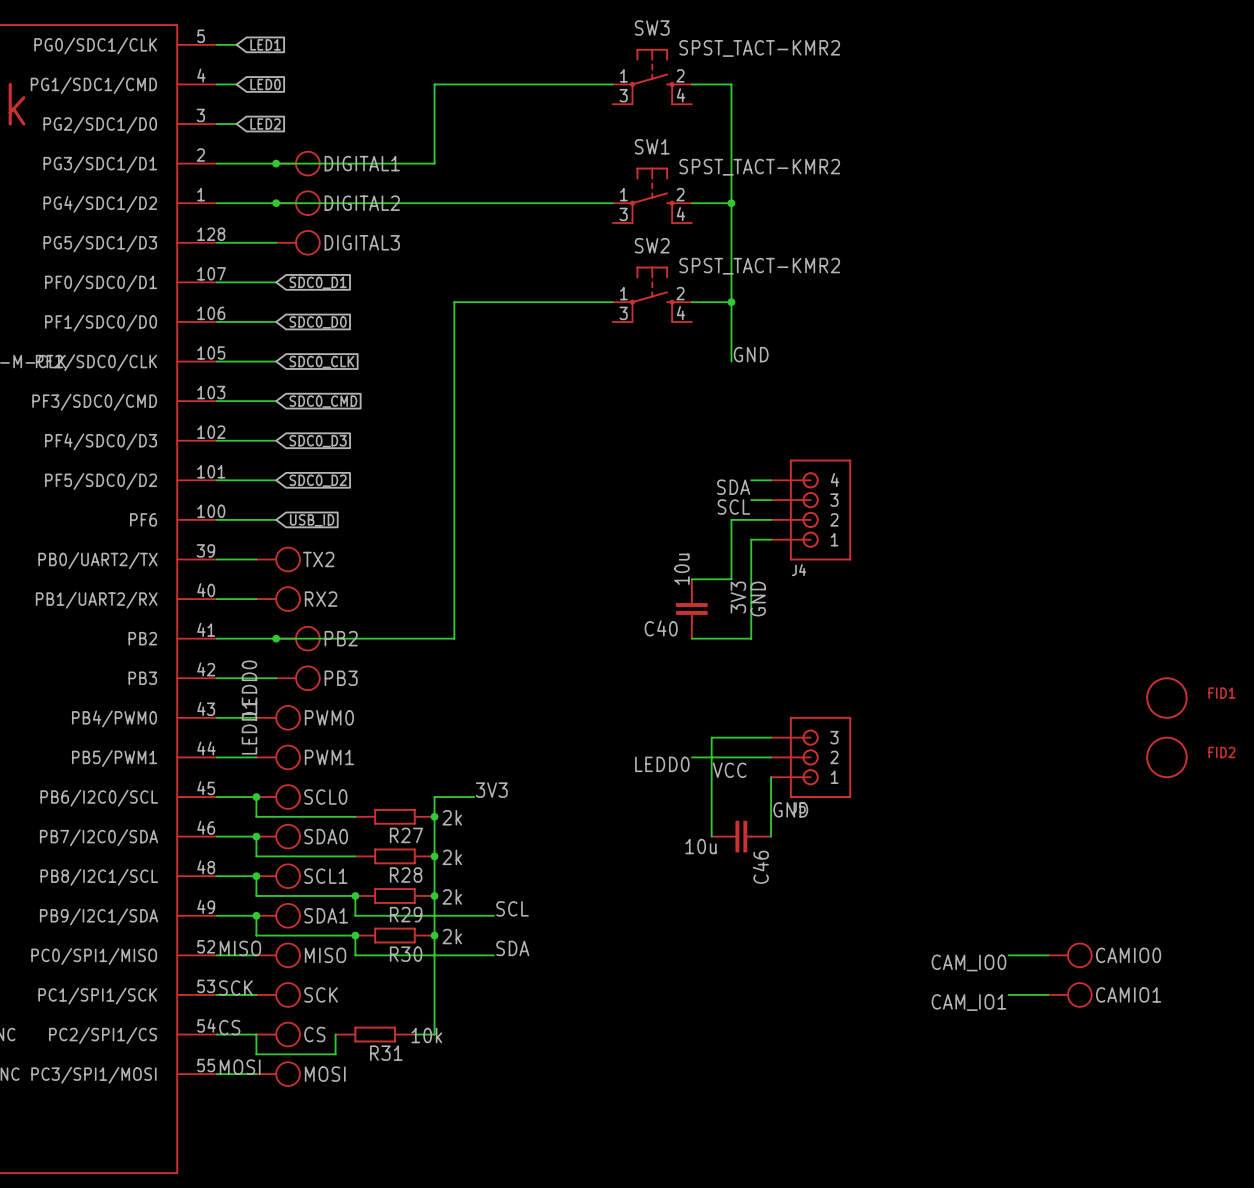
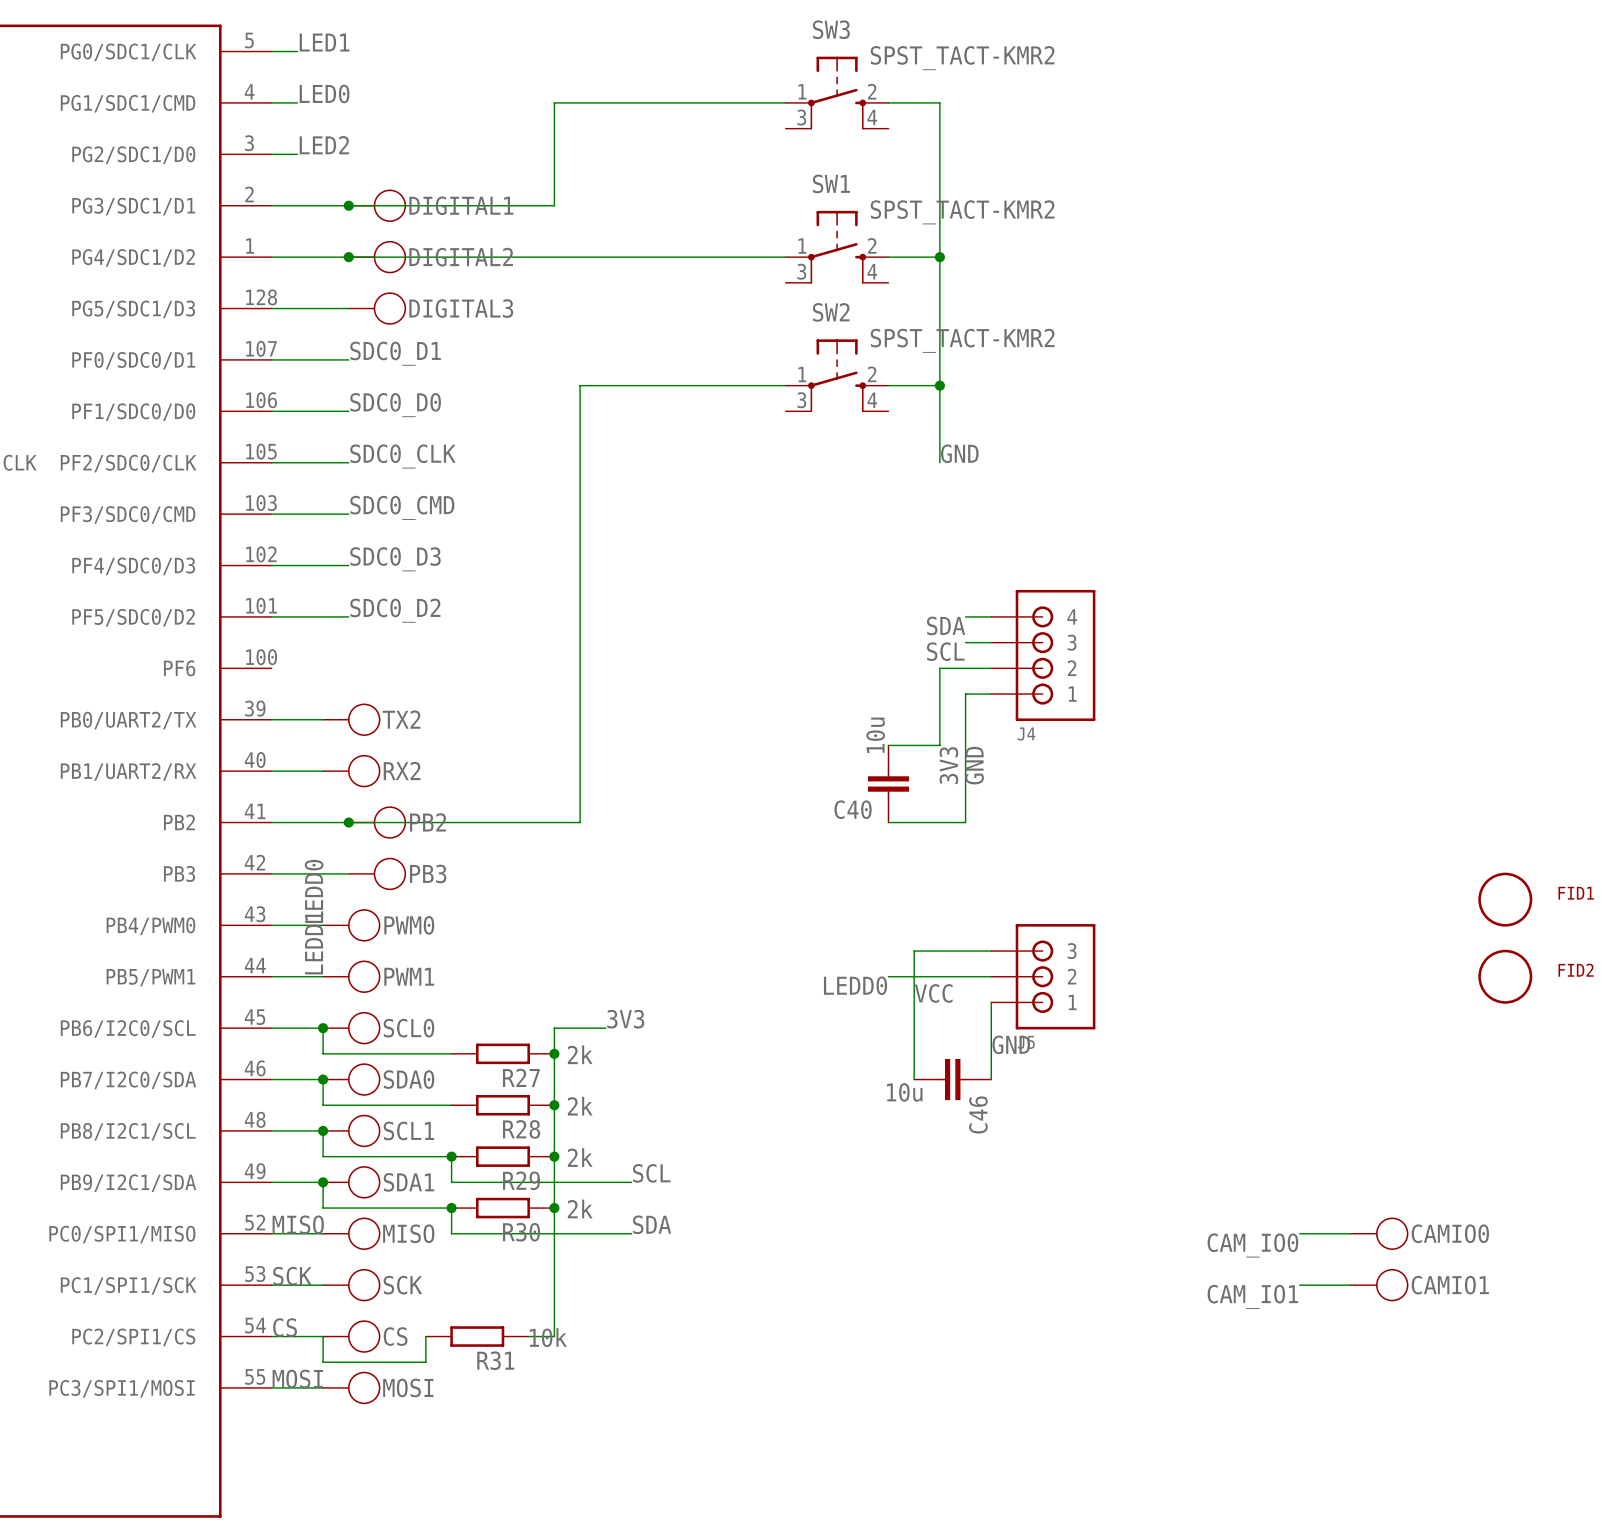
label: none -> LED1 (324, 42)
global label: LED1 (265, 44) -> none
label: none -> LED0 (324, 93)
global label: LED0 (265, 84) -> none
label: none -> LED2 (324, 145)
global label: LED2 (265, 124) -> none
label: none -> SDC0_D1 (395, 353)
global label: SDC0_D1 (318, 282) -> none
label: none -> SDC0_D0 (395, 405)
global label: SDC0_D0 (318, 322) -> none
label: none -> SDC0_CLK (402, 456)
global label: SDC0_CLK (321, 362) -> none
label: none -> SDC0_CMD (402, 507)
global label: SDC0_CMD (323, 401) -> none
label: none -> SDC0_D3 (395, 559)
global label: SDC0_D3 (318, 441) -> none
label: none -> SDC0_D2 (395, 610)
global label: SDC0_D2 (318, 480) -> none
wire: (216, 519) (276, 519) -> none
global label: USB_ID (312, 520) -> none

